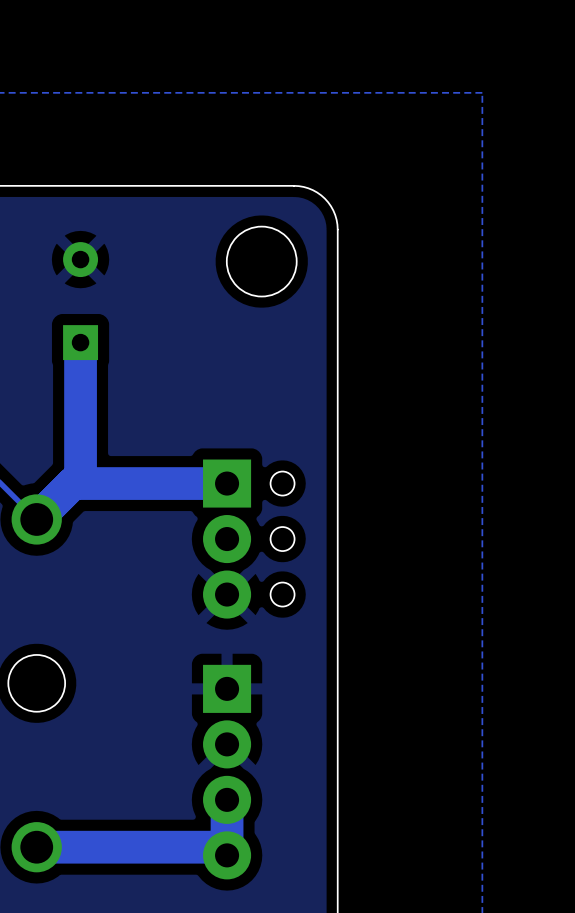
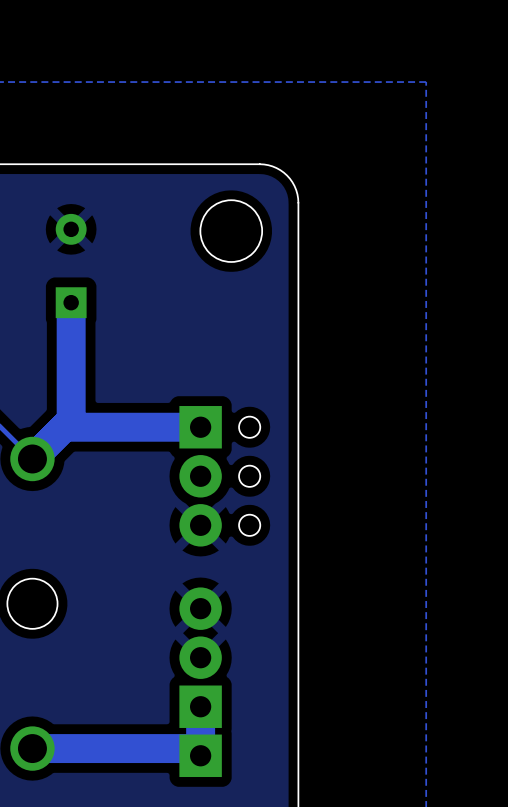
part footprint: [203, 664, 252, 880] -> [179, 587, 222, 778]

